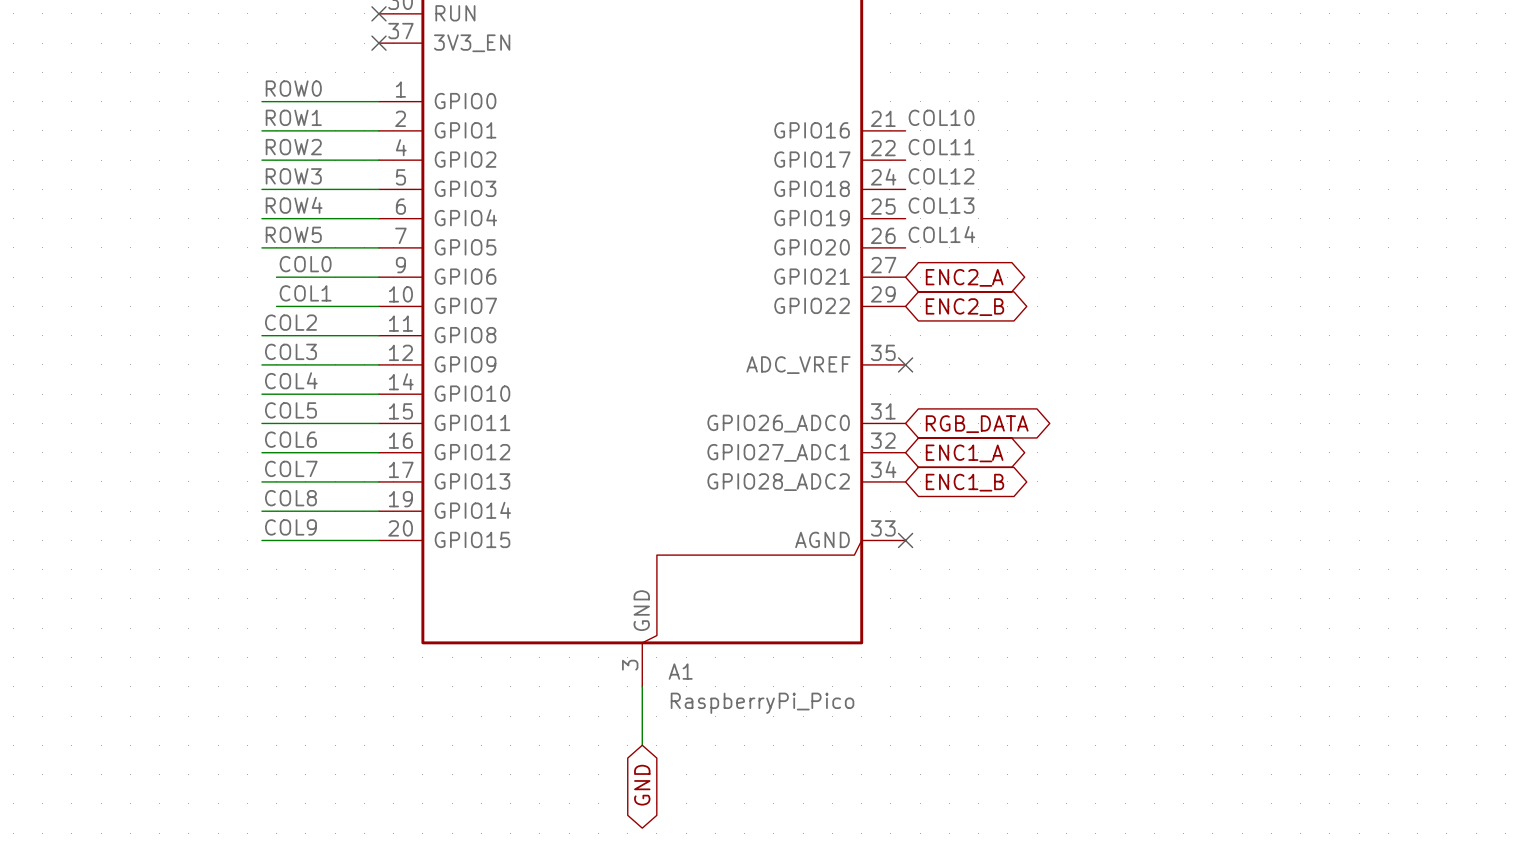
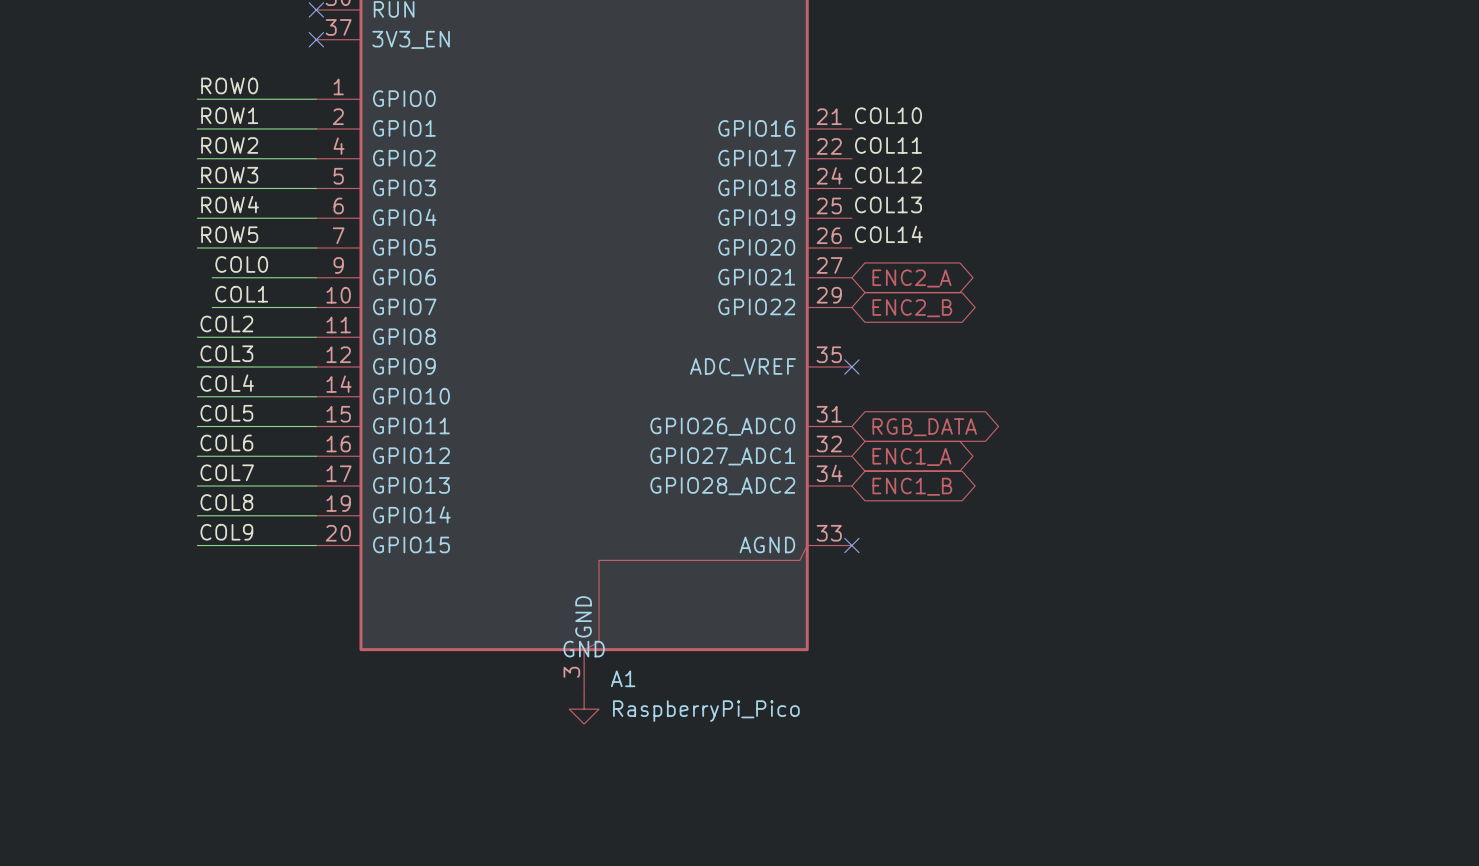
wire: (642, 686) (642, 745) -> none
power symbol: none -> GND (584, 709)
global label: GND (642, 785) -> none

